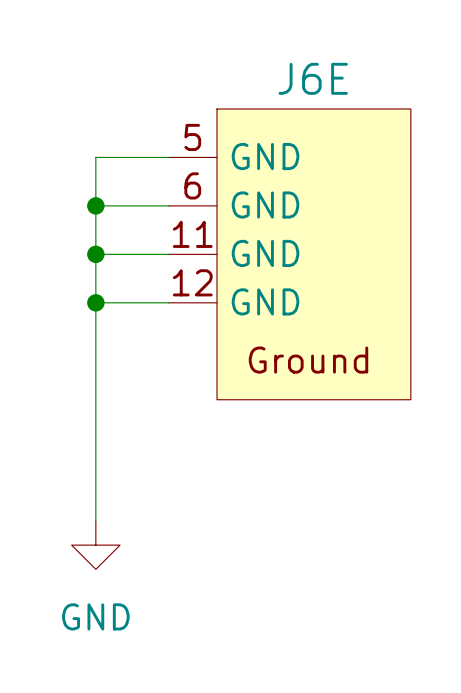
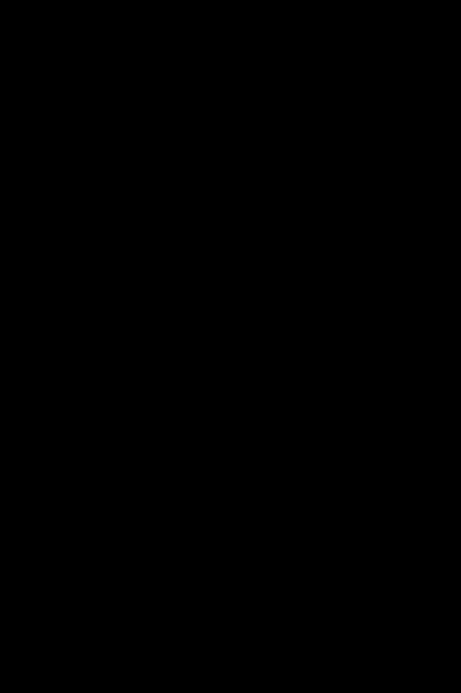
wire: (168, 157) (95, 157) (95, 520) -> none
wire: (95, 205) (168, 205) -> none
junction: (95, 205) -> none
wire: (95, 254) (168, 254) -> none
junction: (95, 254) -> none
J6E: (289, 254) -> none
wire: (95, 302) (168, 302) -> none
junction: (95, 302) -> none
power symbol: GND (95, 545) -> none

